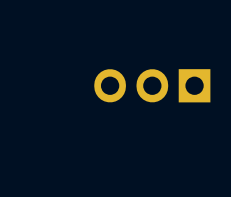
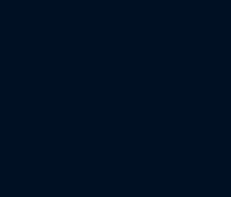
part: (152, 85) -> none

